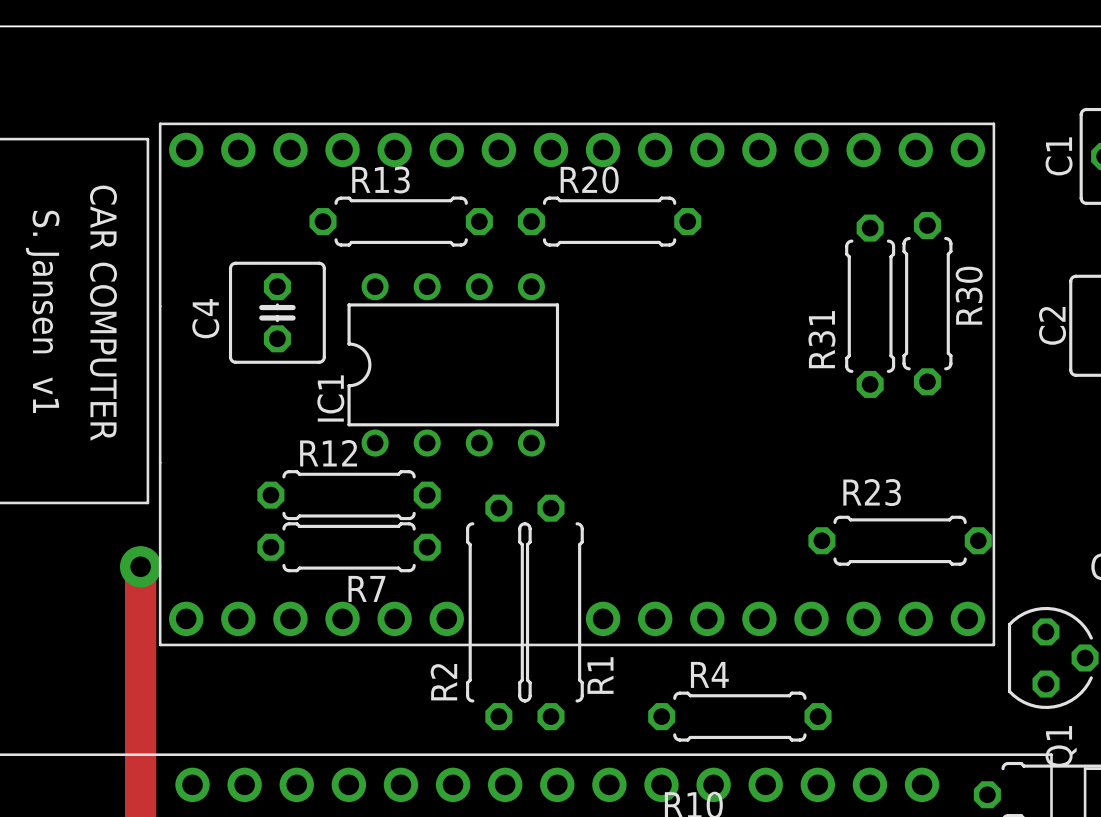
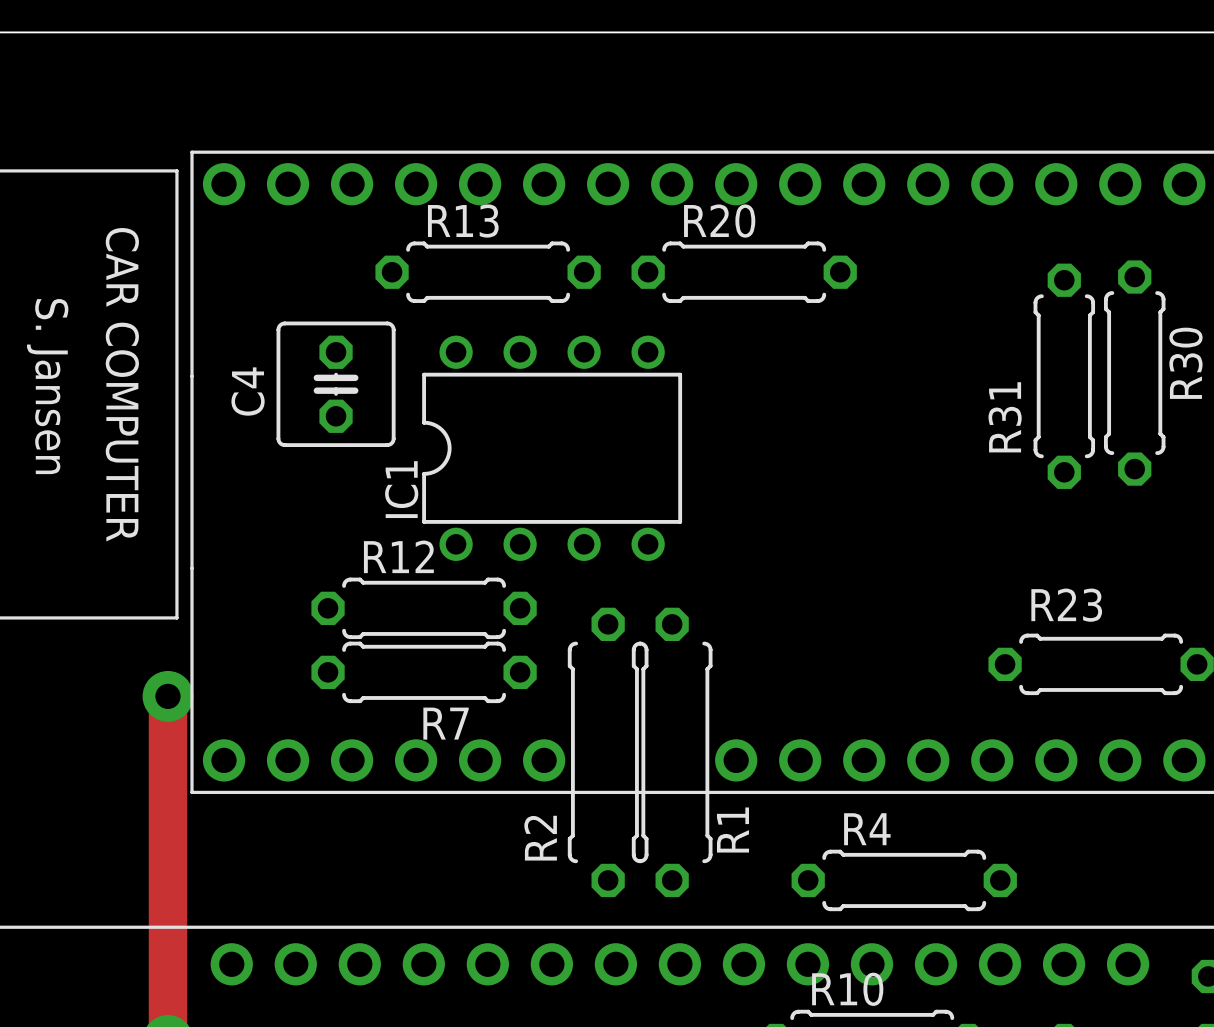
text: S. Jansen v1 (42, 311) -> S. Jansen (47, 386)

